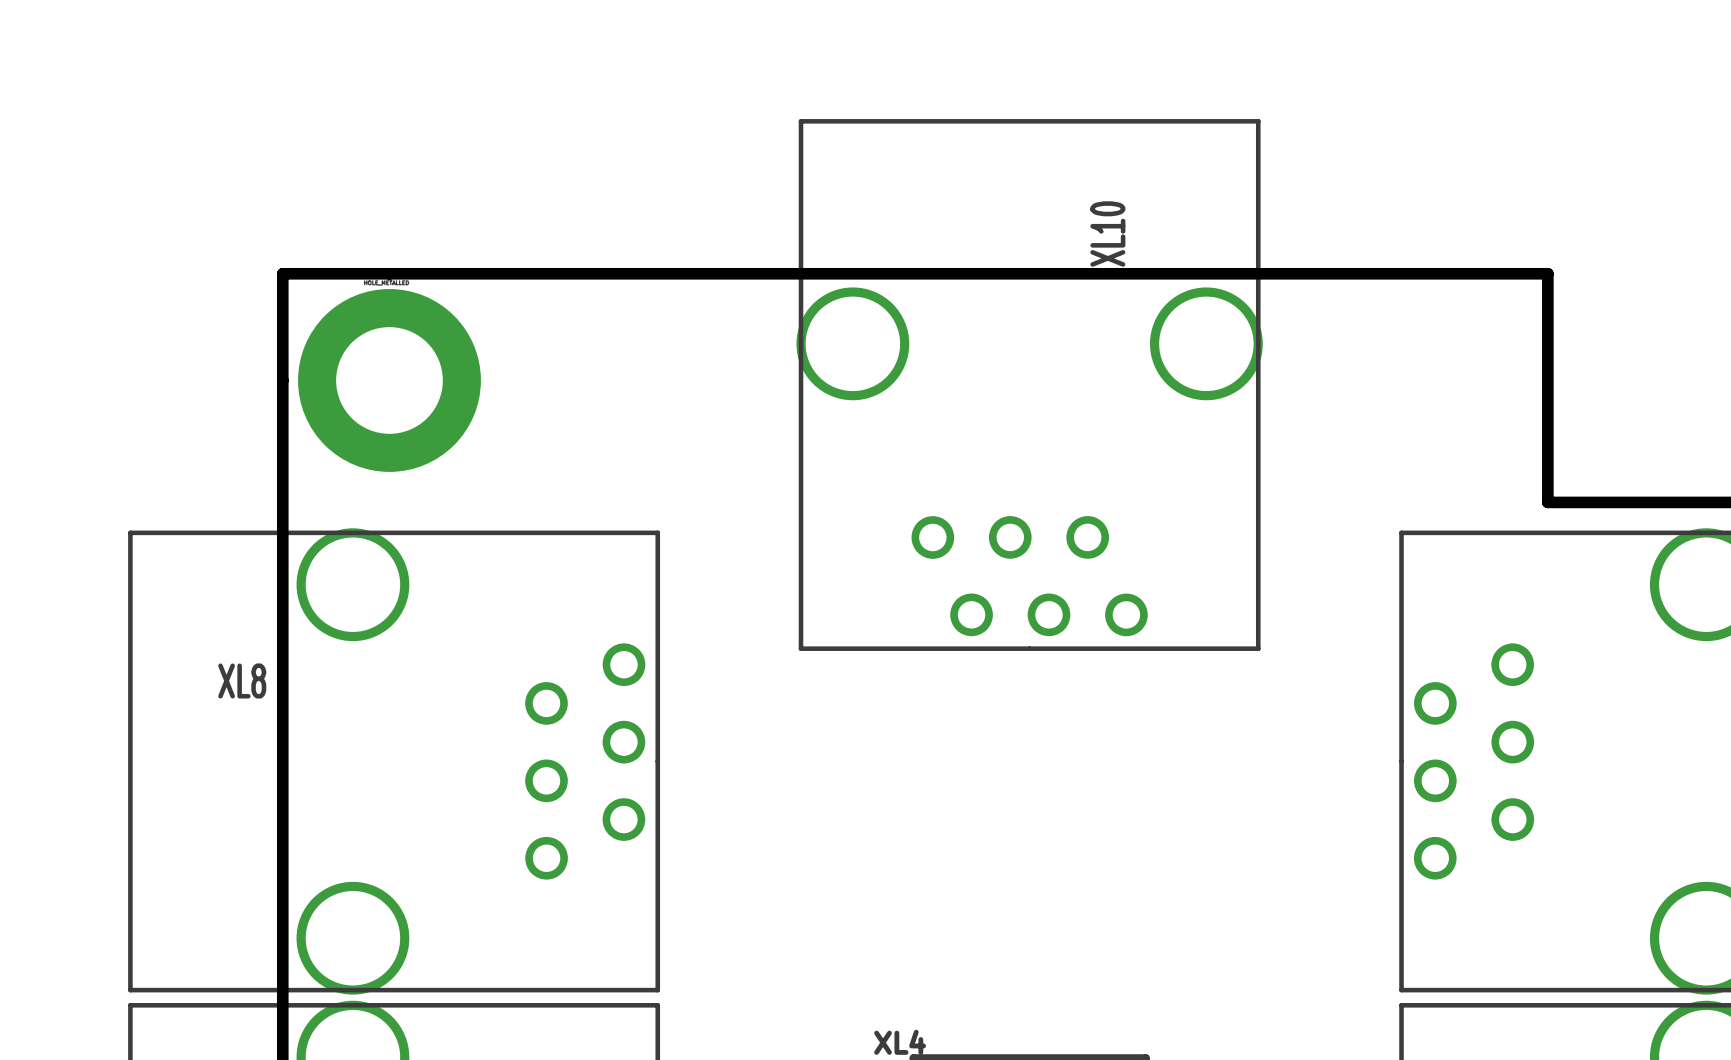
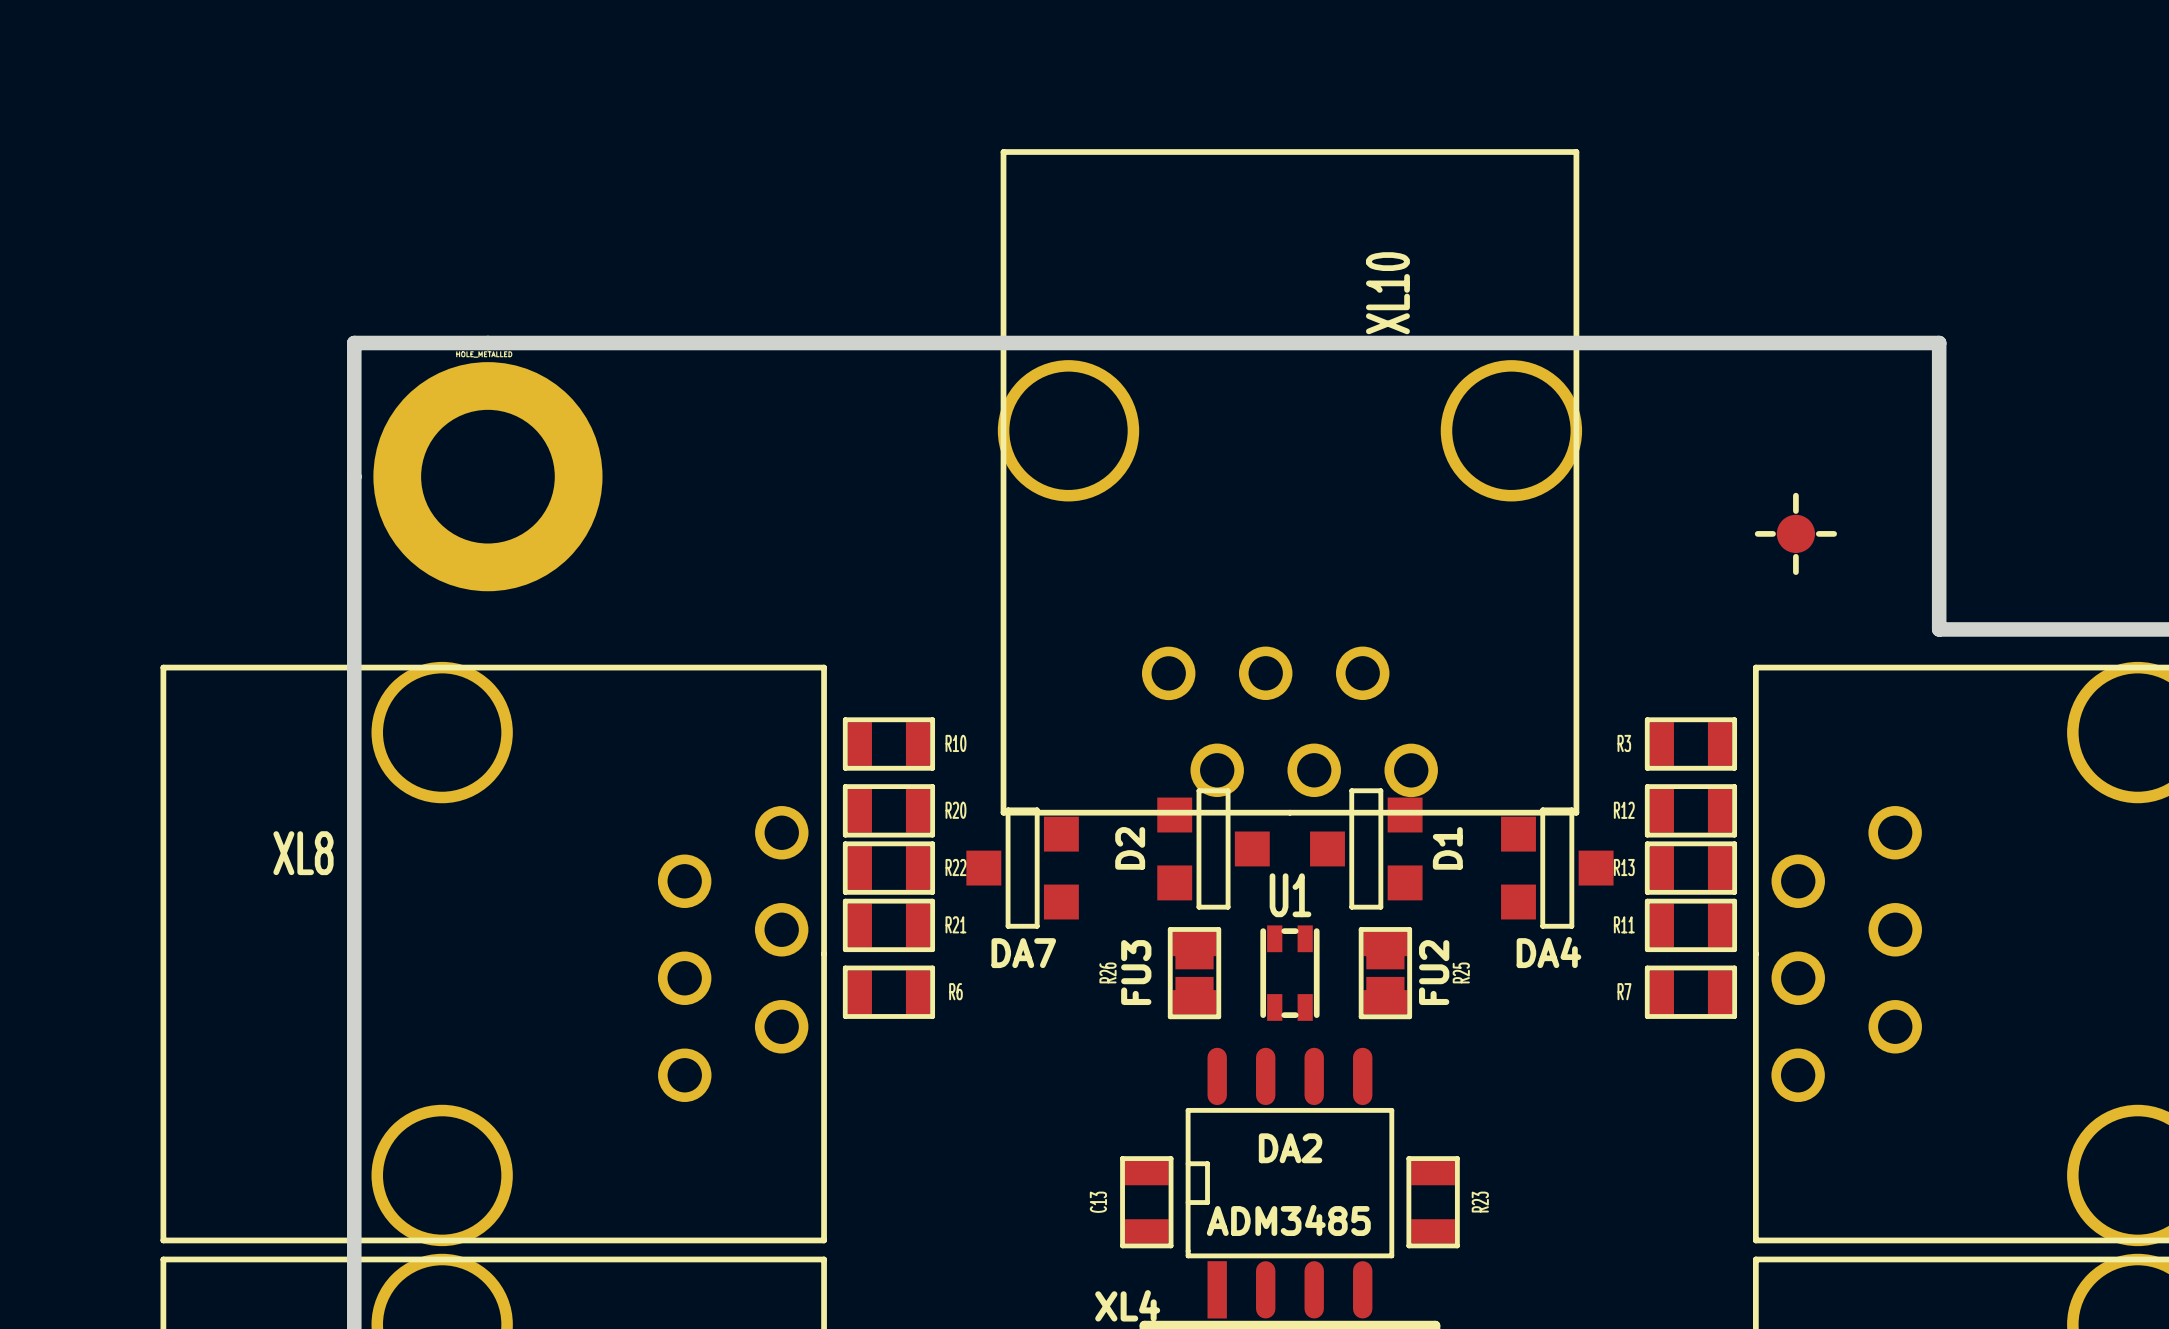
part: none -> (1795, 533)
R10: none -> (888, 744)
R3: none -> (1690, 744)
R20: none -> (888, 810)
R12: none -> (1690, 810)
D2: none -> (1213, 848)
D1: none -> (1366, 848)
R22: none -> (888, 868)
DA7: none -> (1022, 868)
DA4: none -> (1557, 868)
R13: none -> (1690, 868)
R21: none -> (888, 925)
R11: none -> (1690, 925)
FU3: none -> (1194, 973)
R26: none -> (1194, 973)
U1: none -> (1289, 973)
FU2: none -> (1385, 973)
R25: none -> (1385, 973)
R6: none -> (888, 992)
R7: none -> (1690, 992)
DA2: none -> ADM3485 (1289, 1183)
C13: none -> (1146, 1202)
R23: none -> (1433, 1202)

